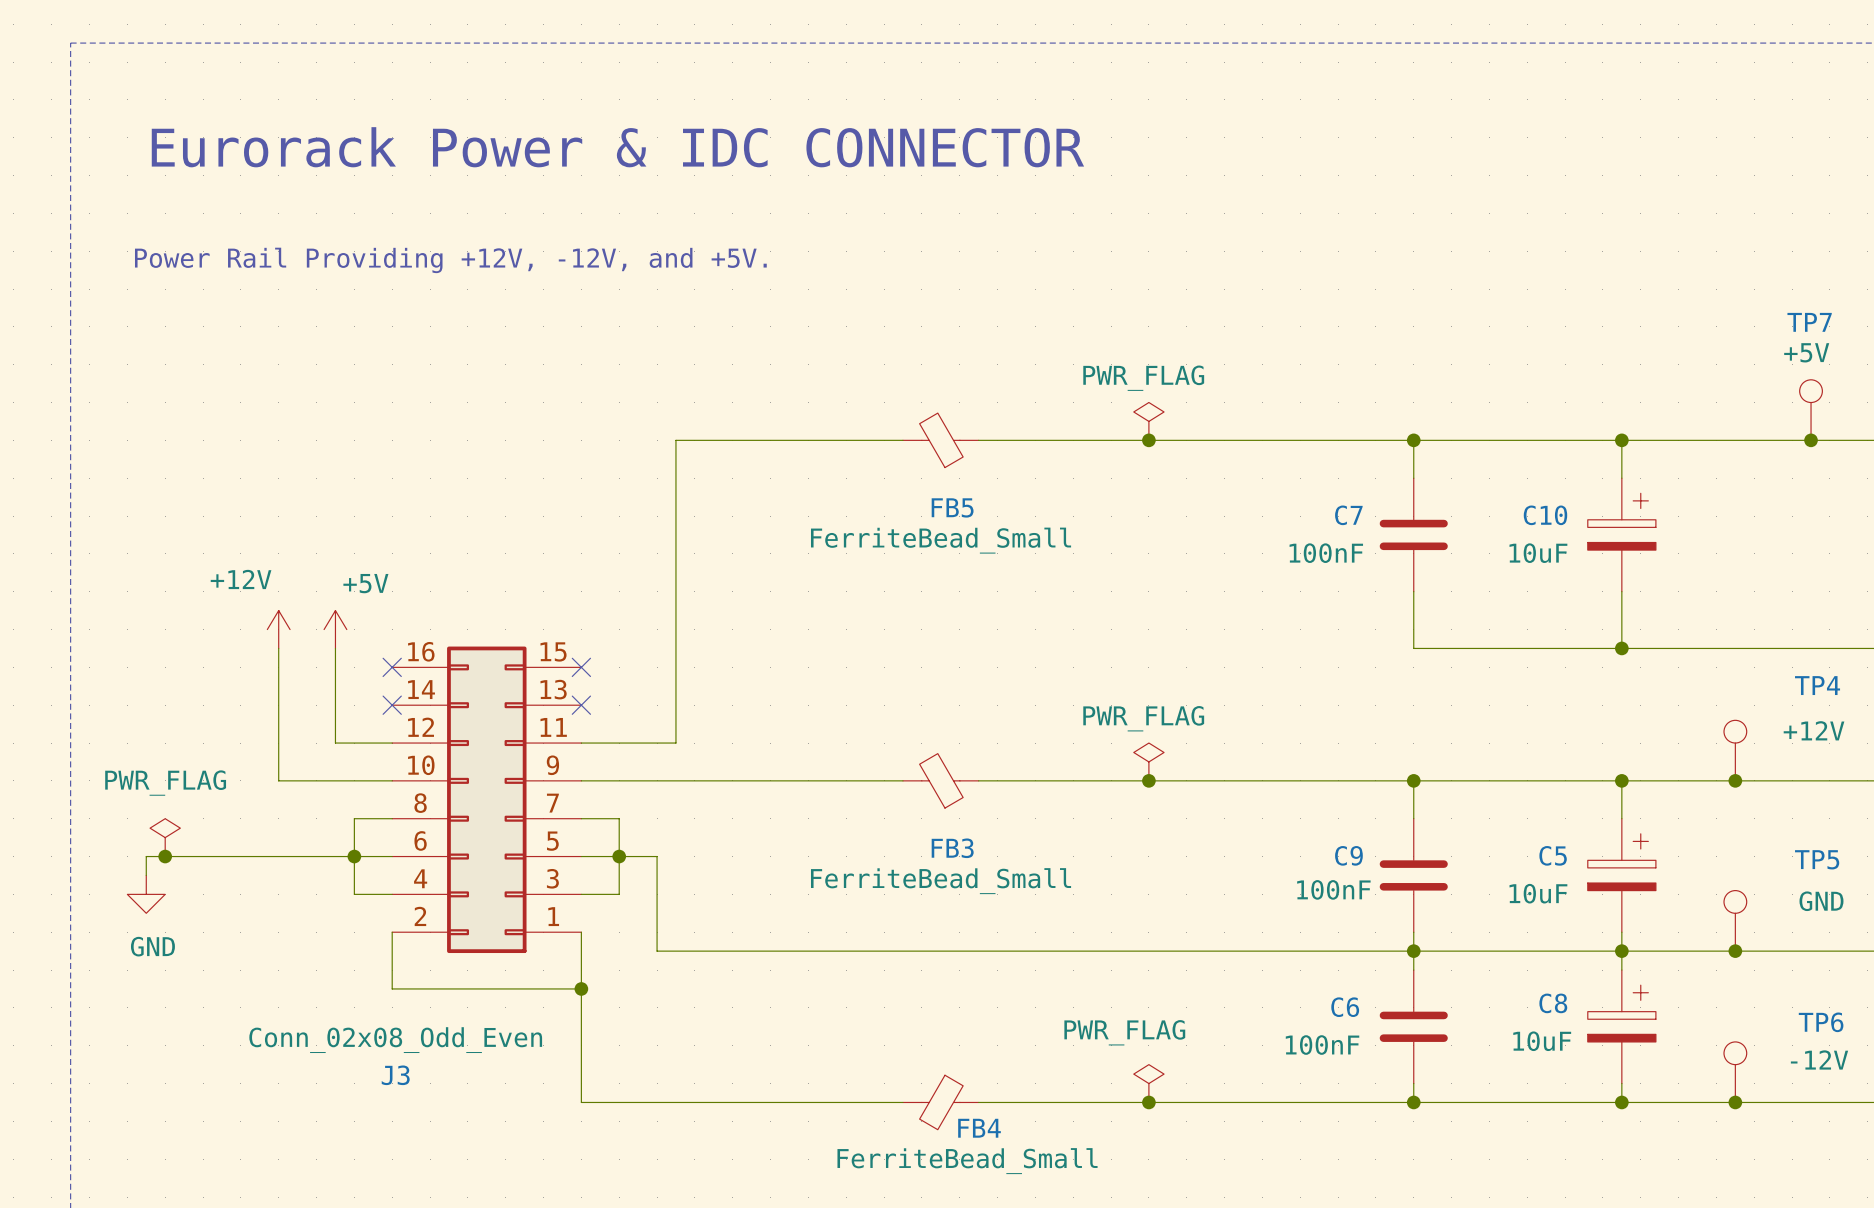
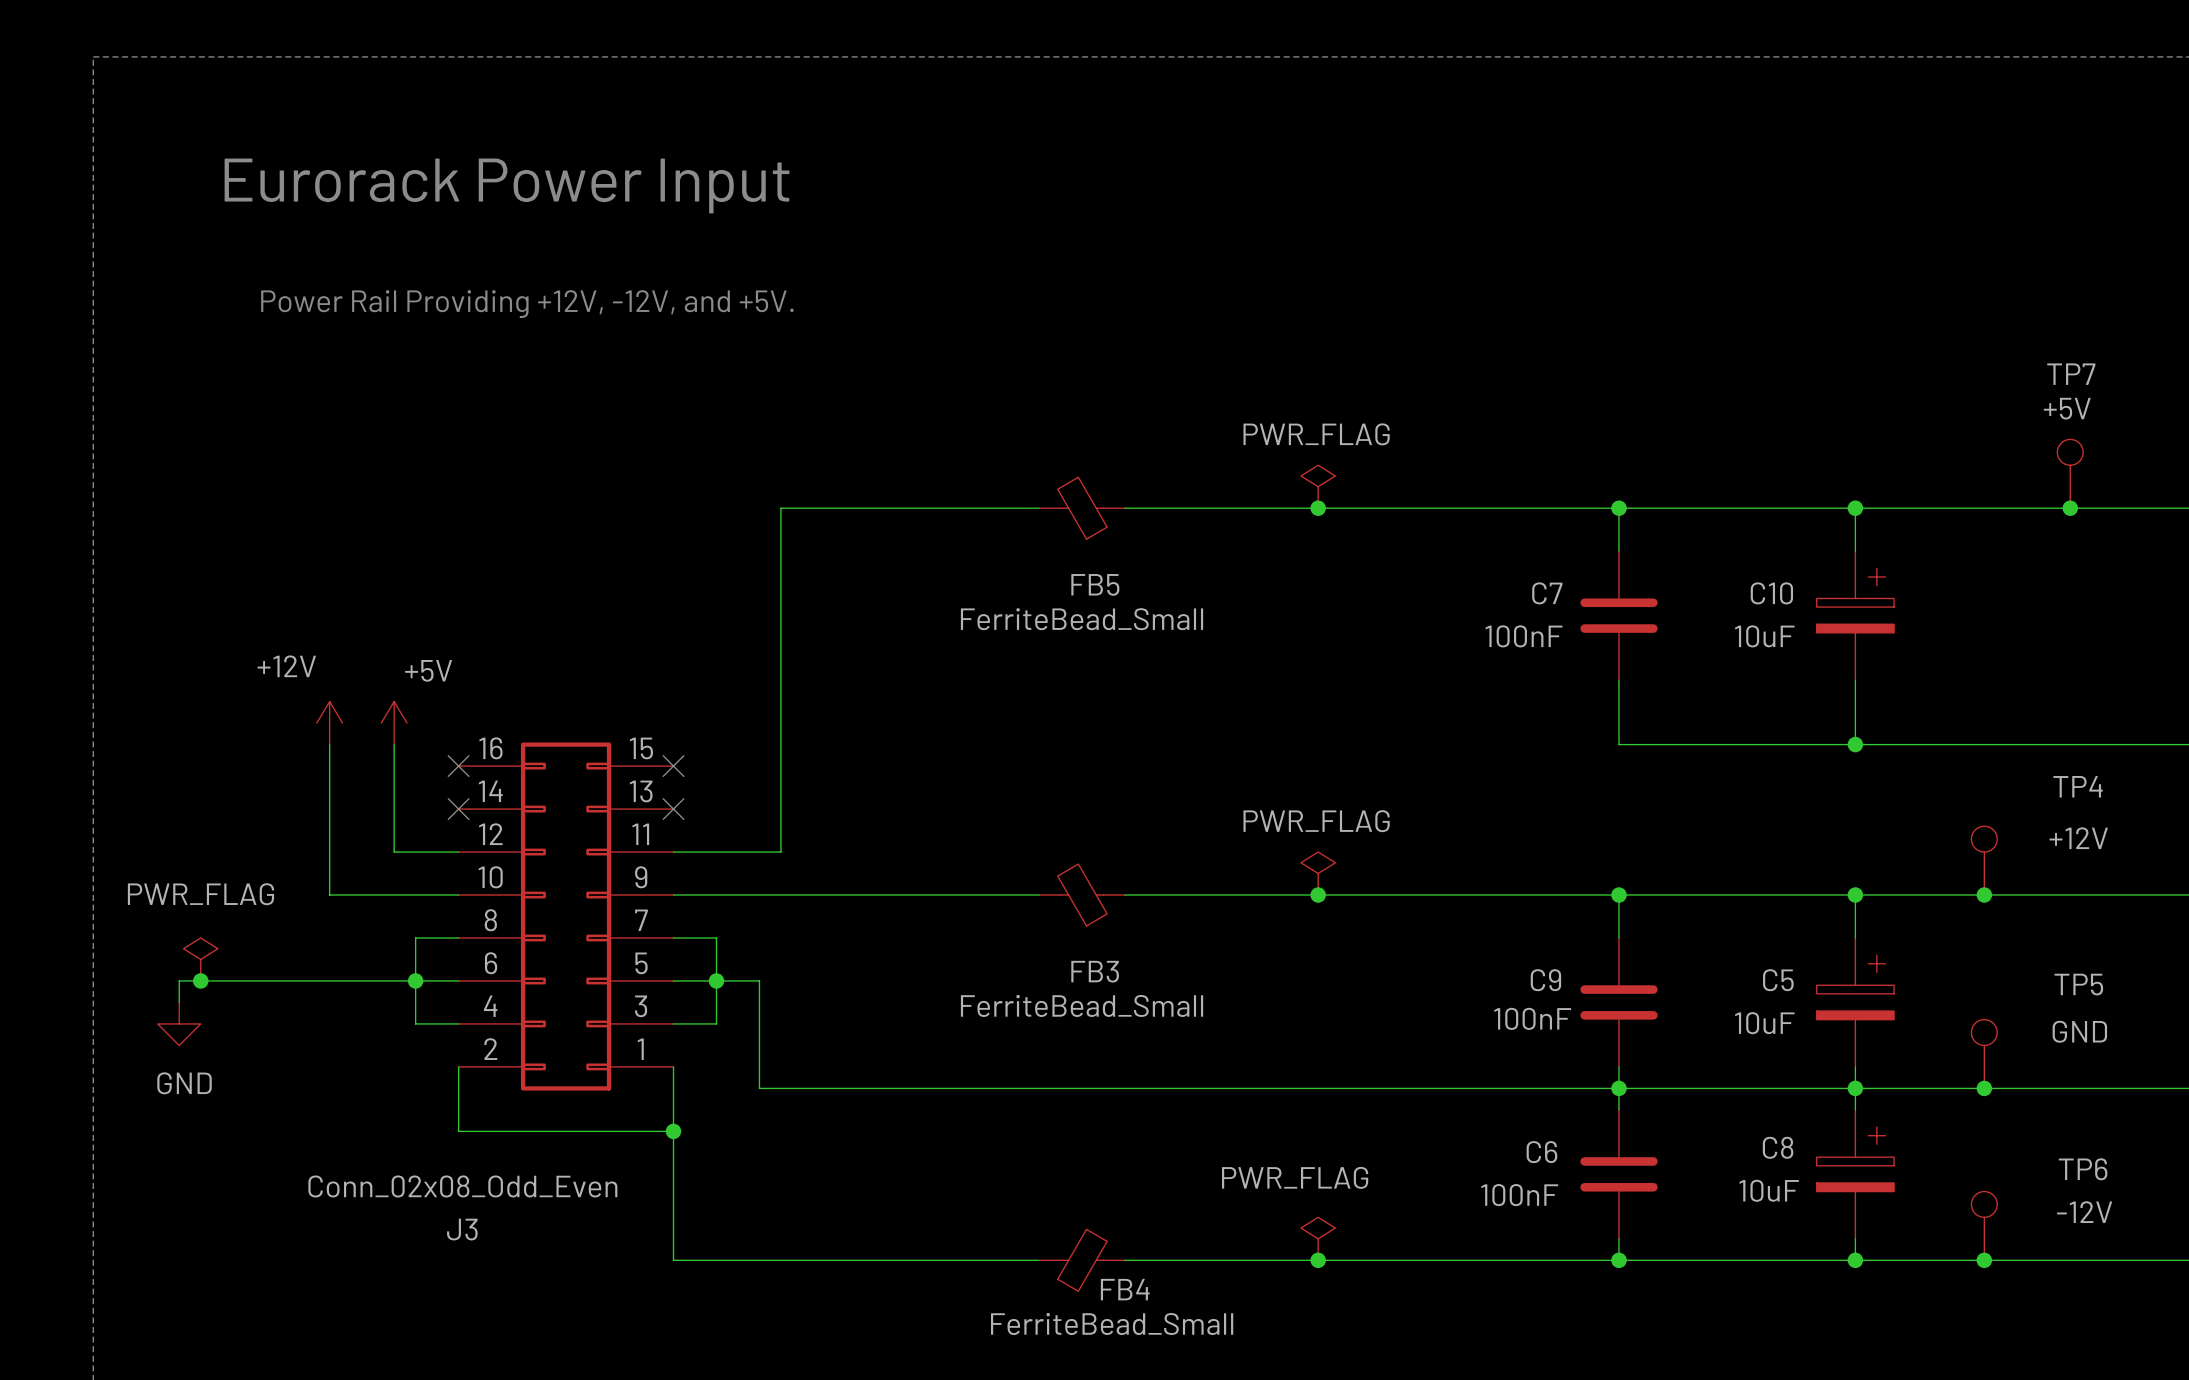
text: Eurorack Power & IDC CONNECTOR (617, 147) -> Eurorack Power Input (507, 185)

